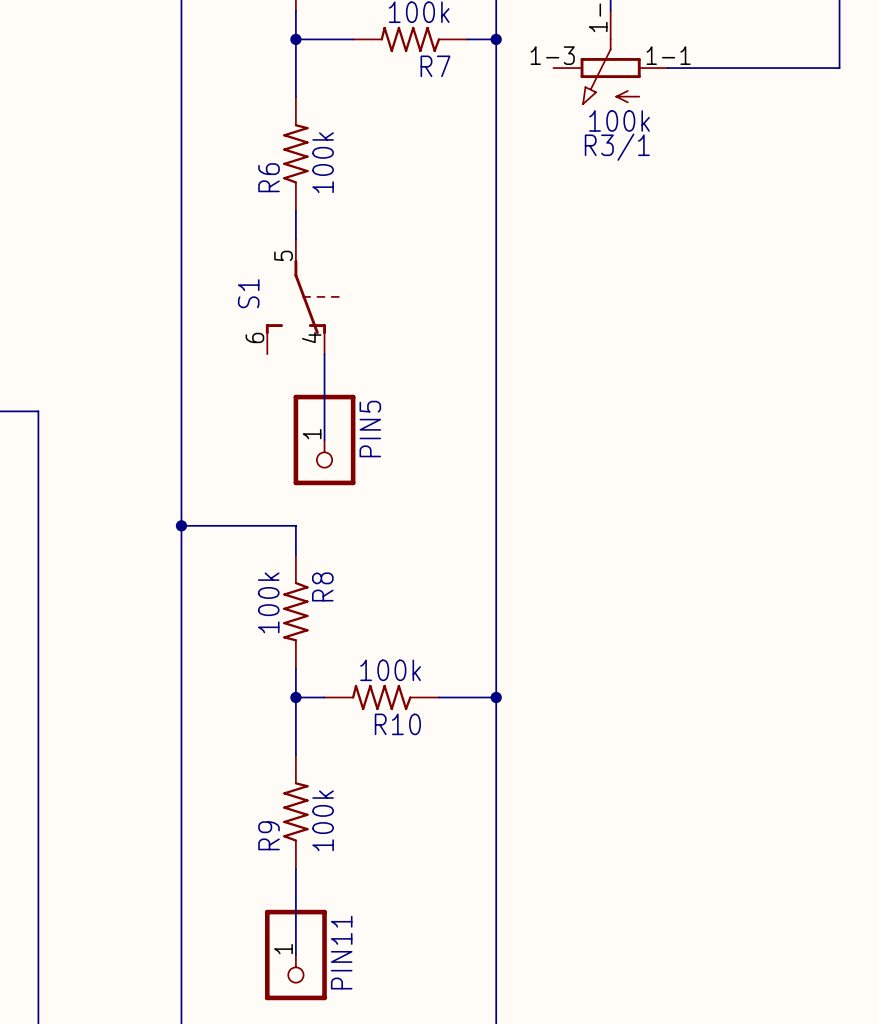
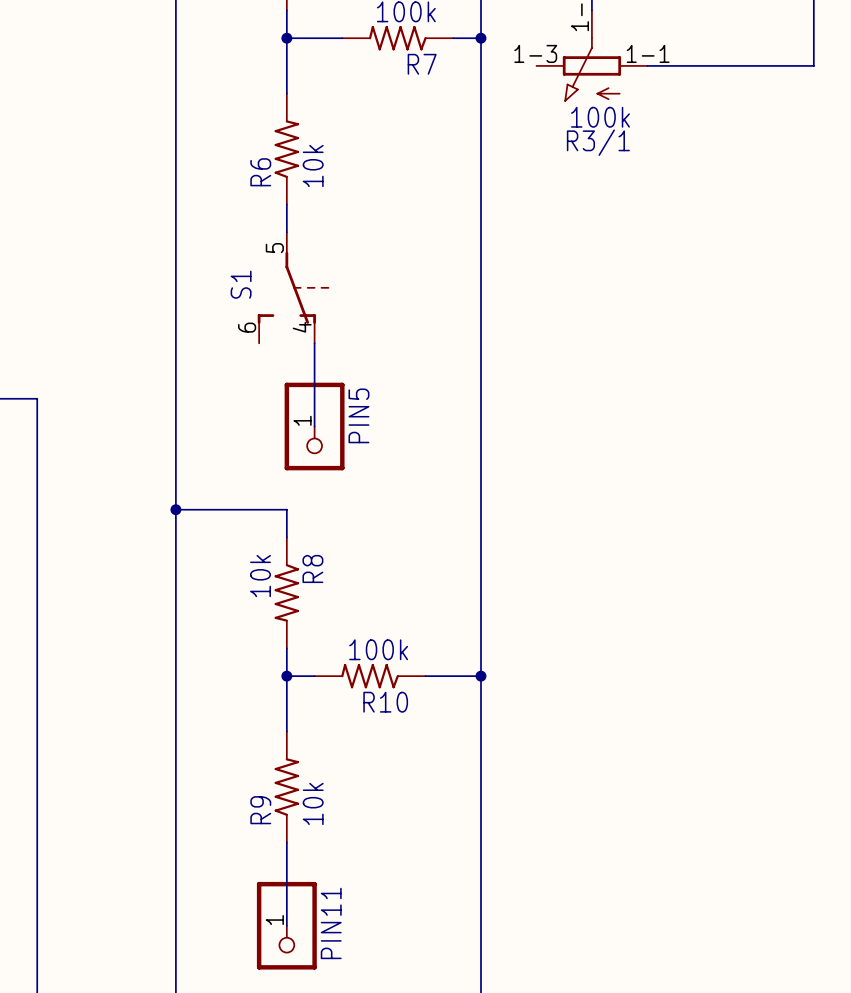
R6 value: 100k (323, 162) -> 10k (313, 166)
R8 value: 100k (268, 602) -> 10k (260, 576)
R9 value: 100k (323, 820) -> 10k (313, 803)

